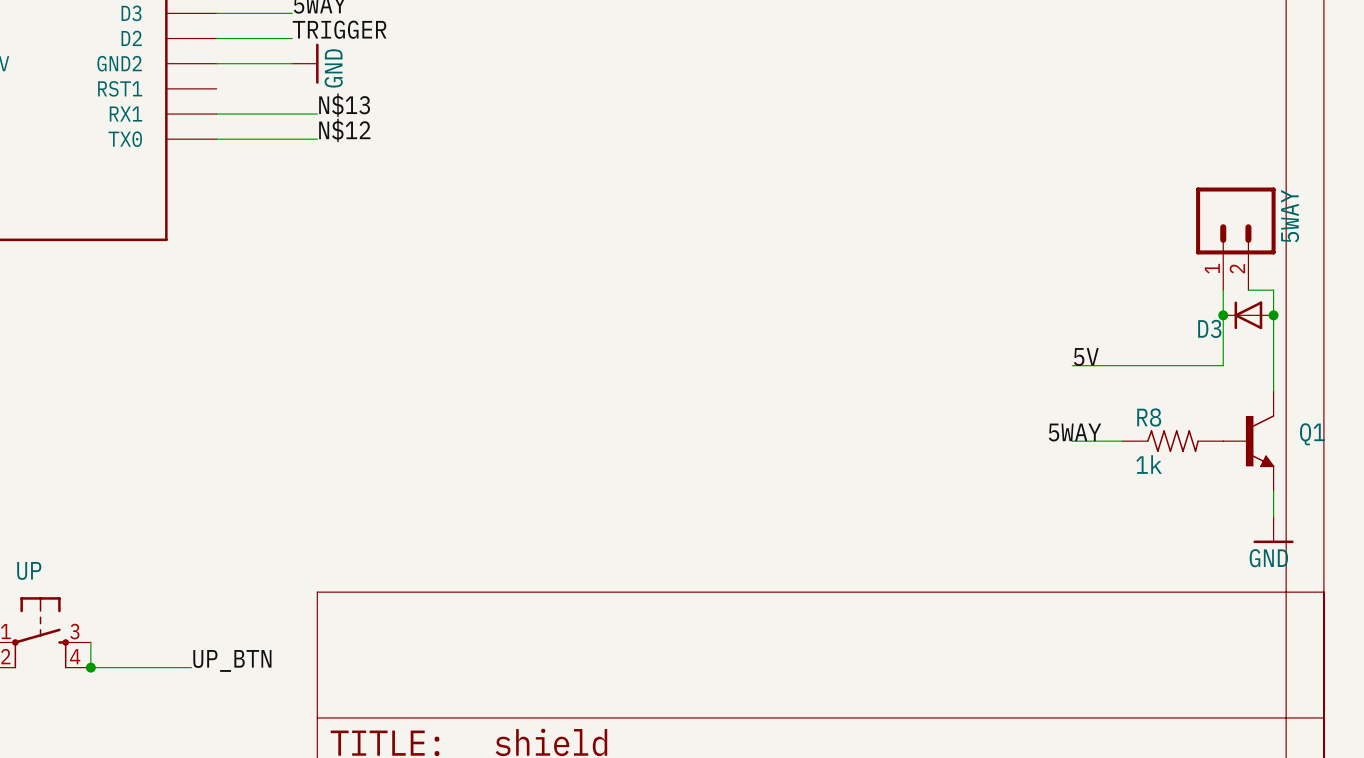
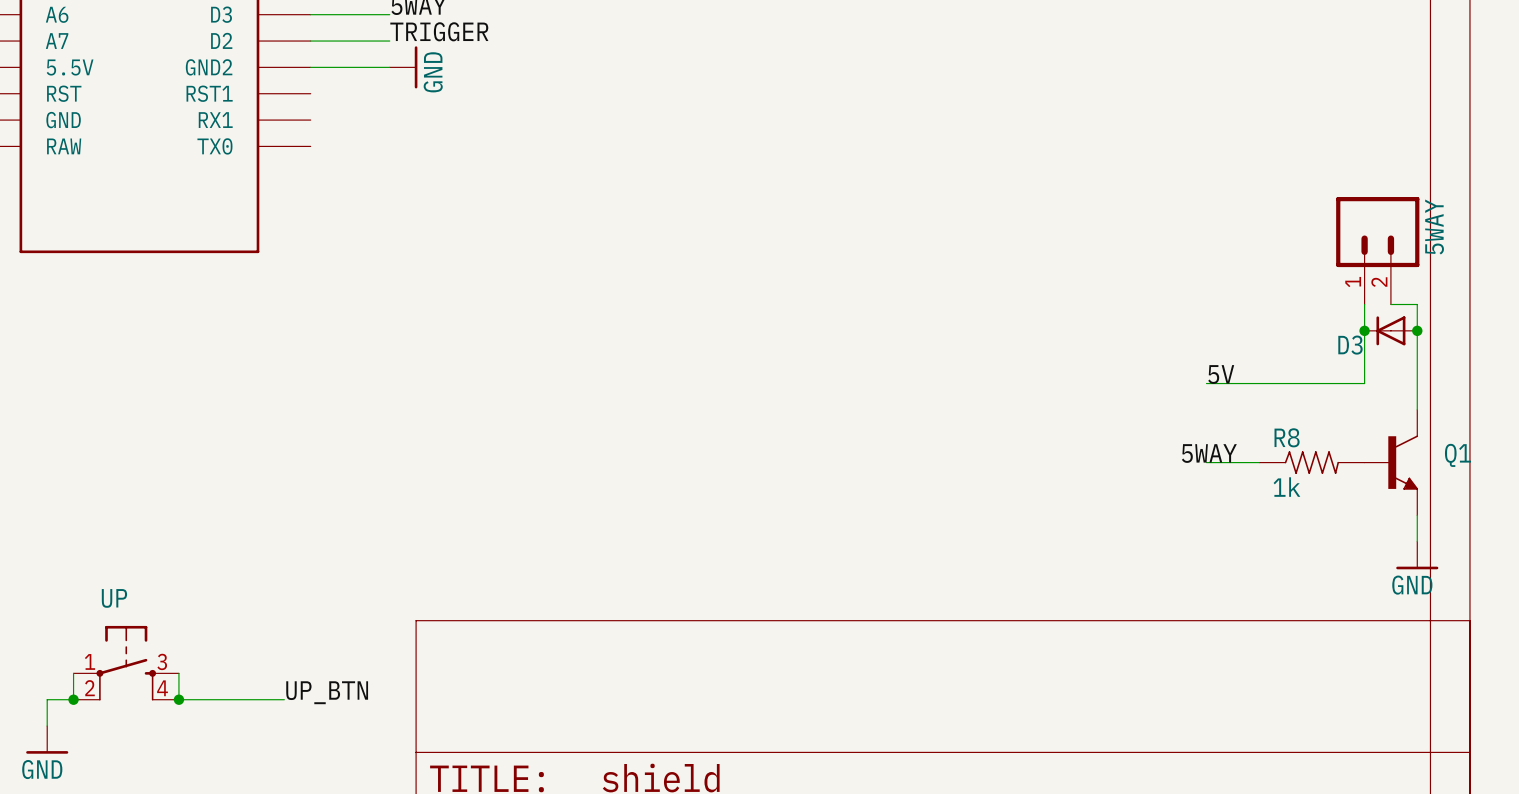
label: N$13 (344, 105) -> none
wire: (216, 114) (317, 114) -> none
label: N$12 (344, 130) -> none
wire: (216, 139) (317, 139) -> none

